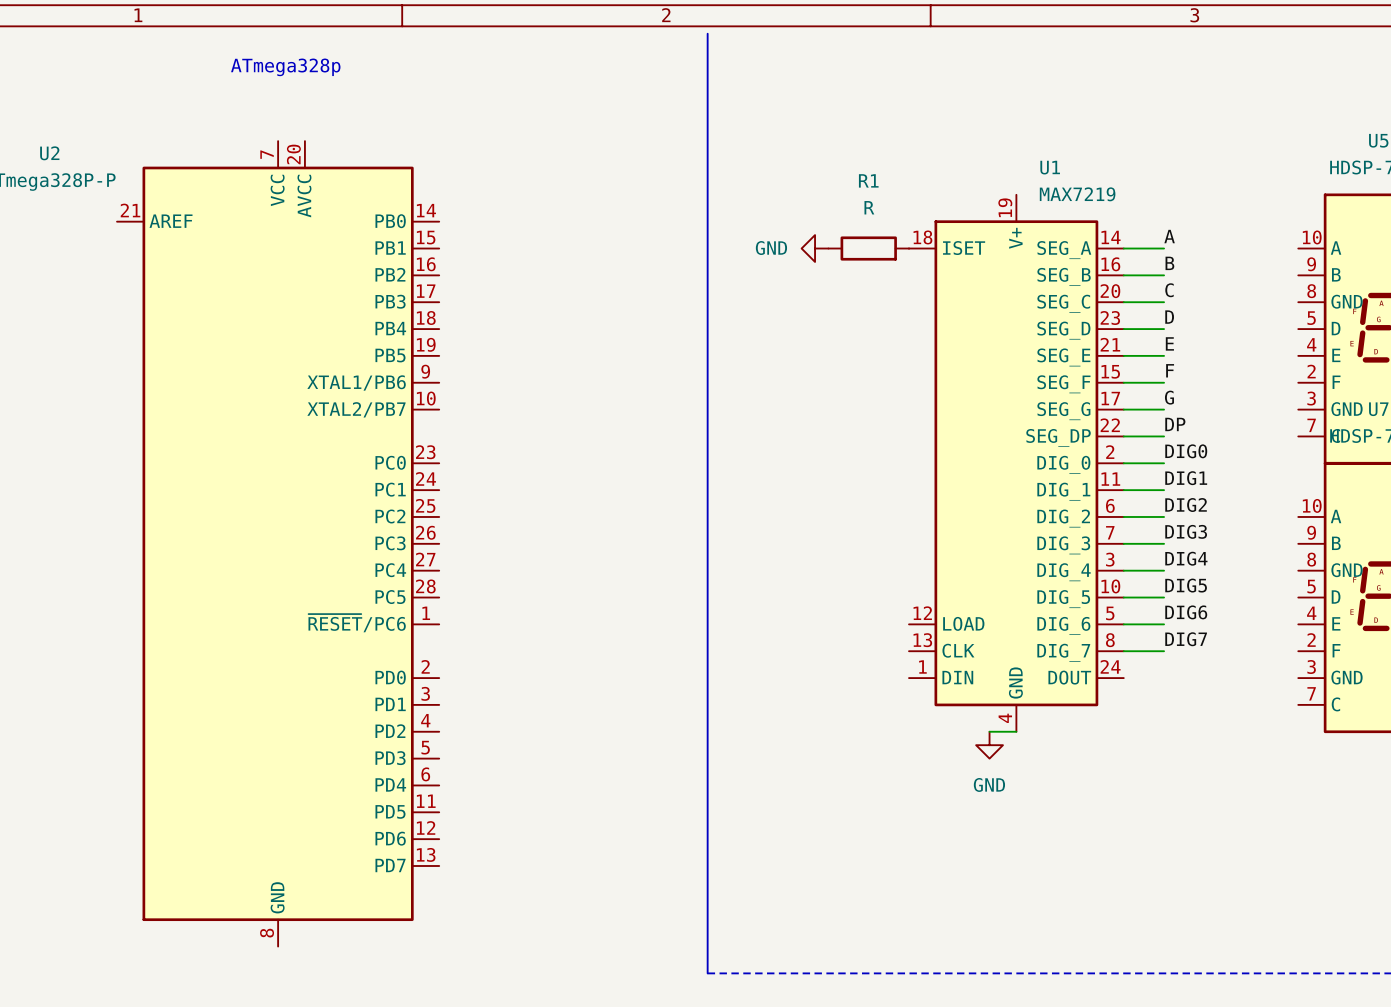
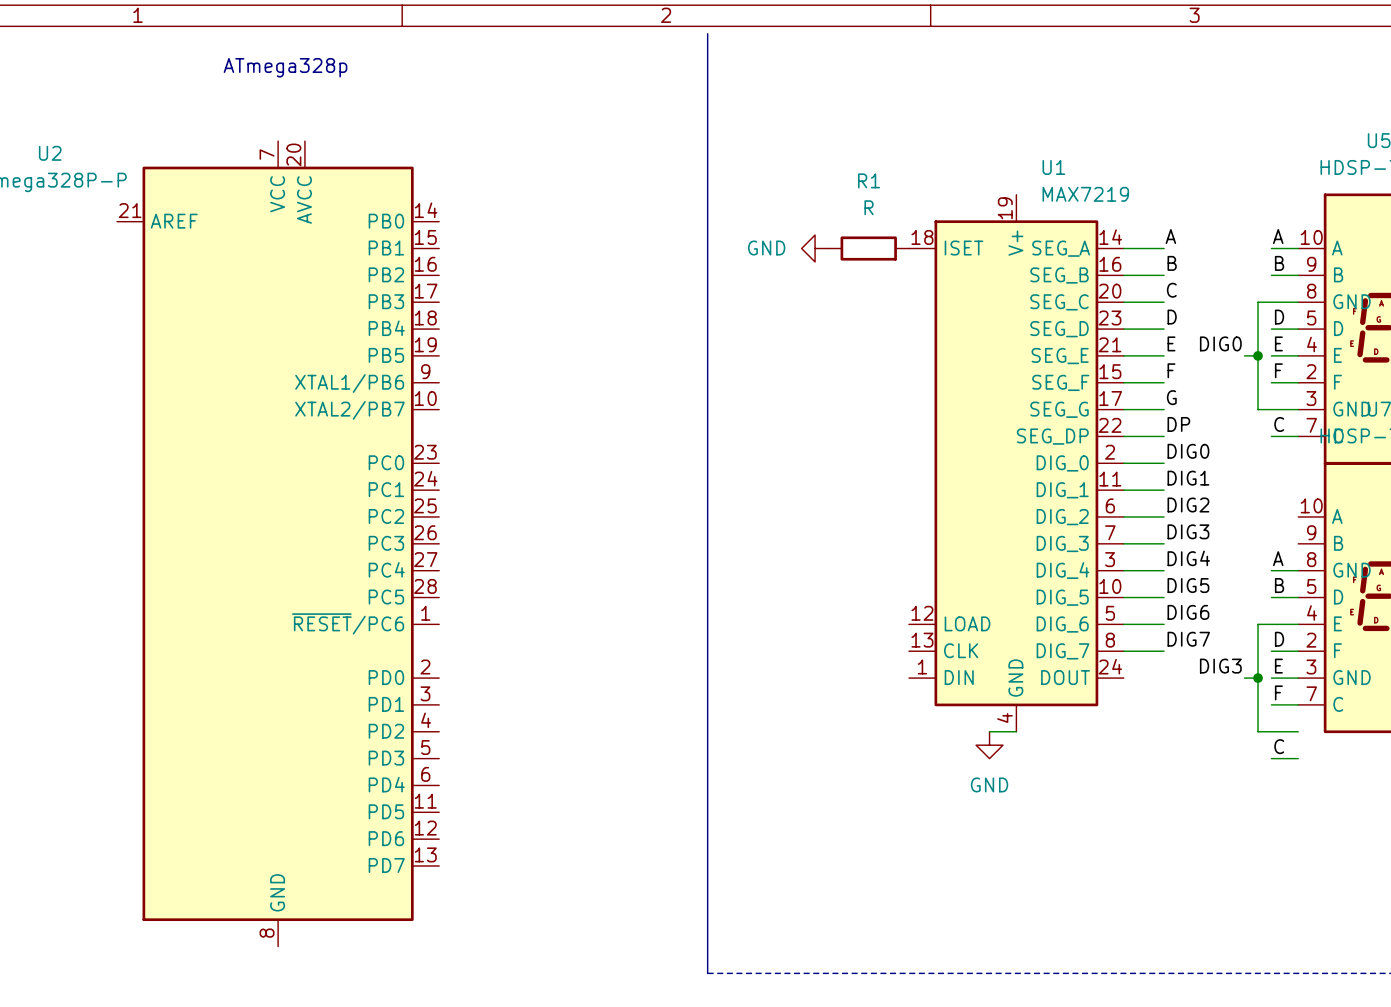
label: none -> A (1278, 236)
wire: none -> (1271, 248) (1298, 248)
label: none -> B (1279, 263)
wire: none -> (1271, 275) (1298, 275)
wire: none -> (1298, 302) (1258, 302) (1258, 409) (1298, 409)
label: none -> D (1279, 317)
wire: none -> (1271, 329) (1298, 329)
label: none -> DIG0 (1220, 343)
label: none -> E (1278, 343)
wire: none -> (1244, 355) (1258, 355)
junction: none -> (1258, 355)
wire: none -> (1271, 355) (1298, 355)
label: none -> F (1278, 370)
wire: none -> (1271, 382) (1298, 382)
label: none -> C (1279, 424)
wire: none -> (1271, 436) (1298, 436)
label: none -> A (1278, 558)
wire: none -> (1271, 570) (1298, 570)
label: none -> B (1279, 585)
wire: none -> (1271, 597) (1298, 597)
wire: none -> (1298, 624) (1258, 624) (1258, 731) (1298, 731)
label: none -> D (1279, 639)
wire: none -> (1271, 651) (1298, 651)
label: none -> DIG3 (1220, 666)
label: none -> E (1278, 666)
wire: none -> (1244, 678) (1258, 678)
junction: none -> (1258, 678)
wire: none -> (1271, 678) (1298, 678)
label: none -> F (1278, 692)
wire: none -> (1271, 704) (1298, 704)
label: none -> C (1279, 746)
wire: none -> (1271, 758) (1298, 758)

